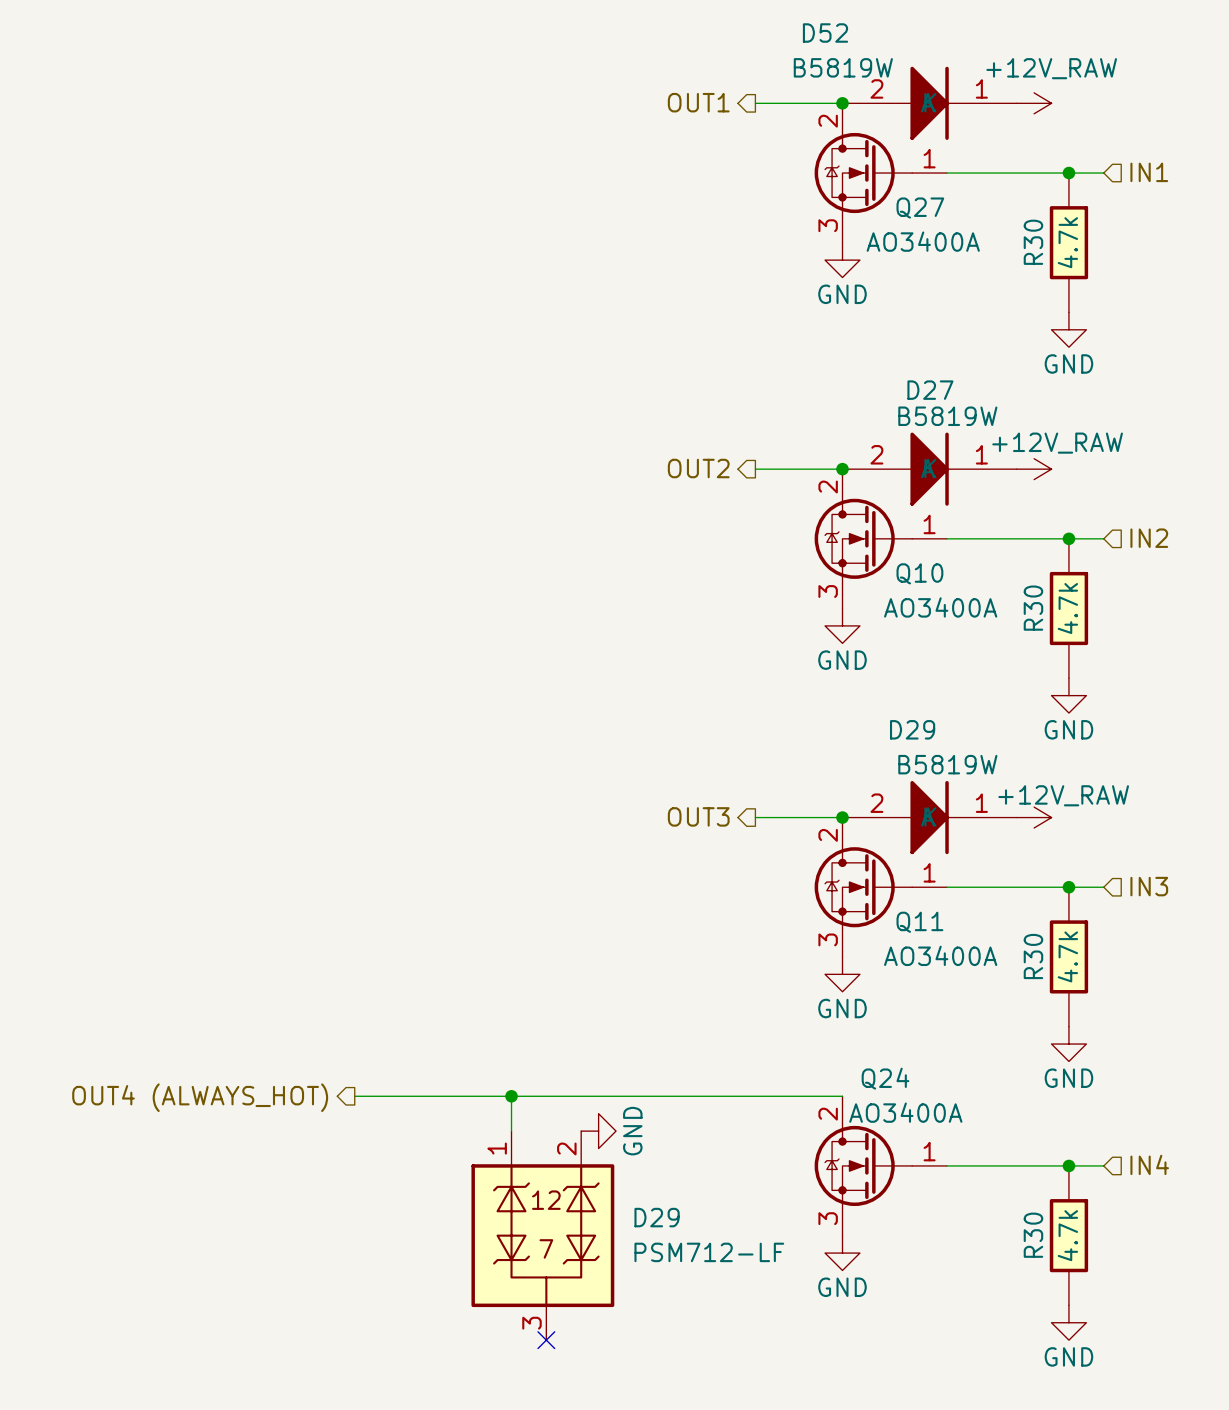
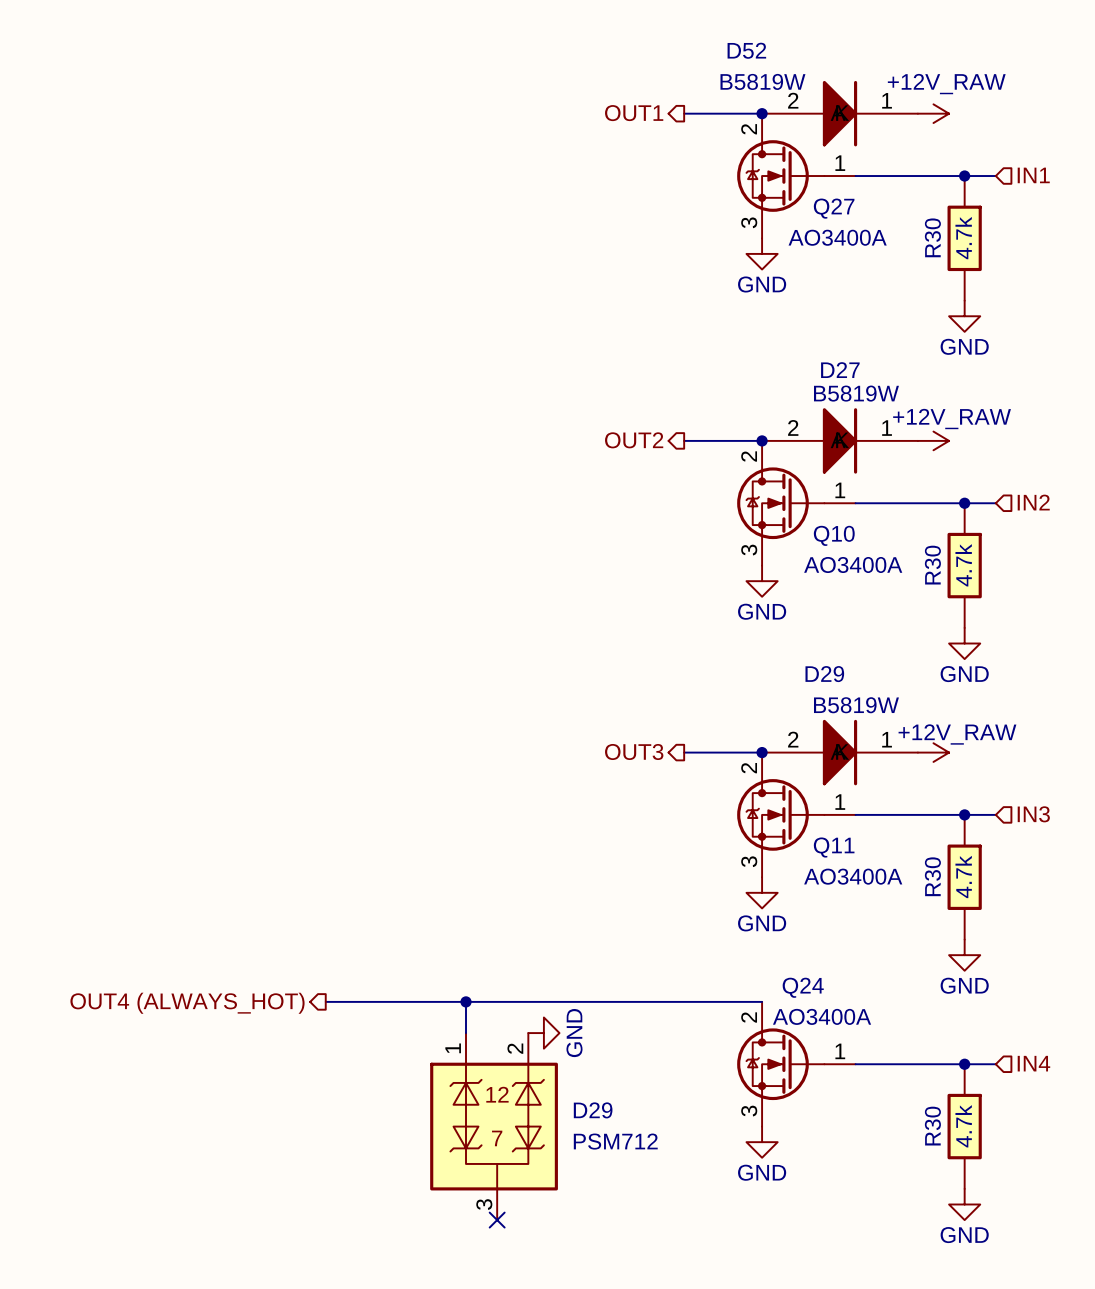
D29 value: PSM712-LF (709, 1252) -> PSM712 (615, 1141)

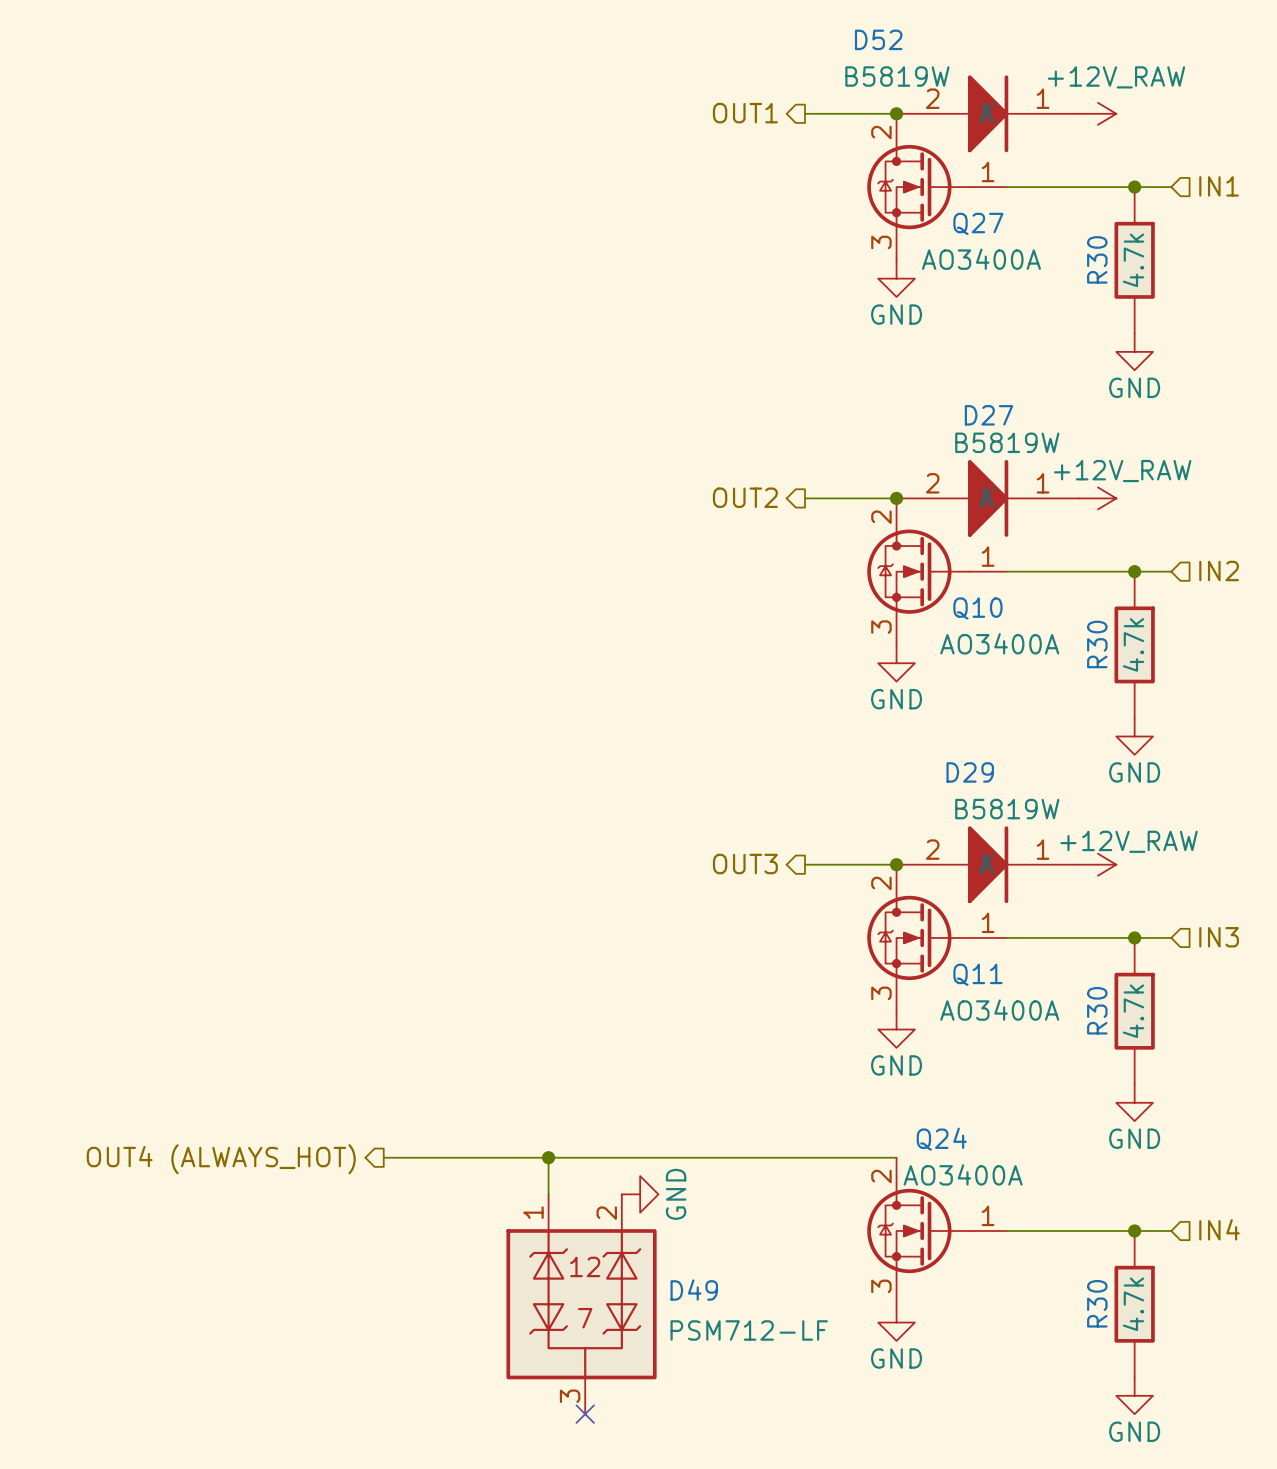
D29 name: D29 (593, 1110) -> D49 (694, 1290)
D29 value: PSM712 (615, 1141) -> PSM712-LF (749, 1330)

